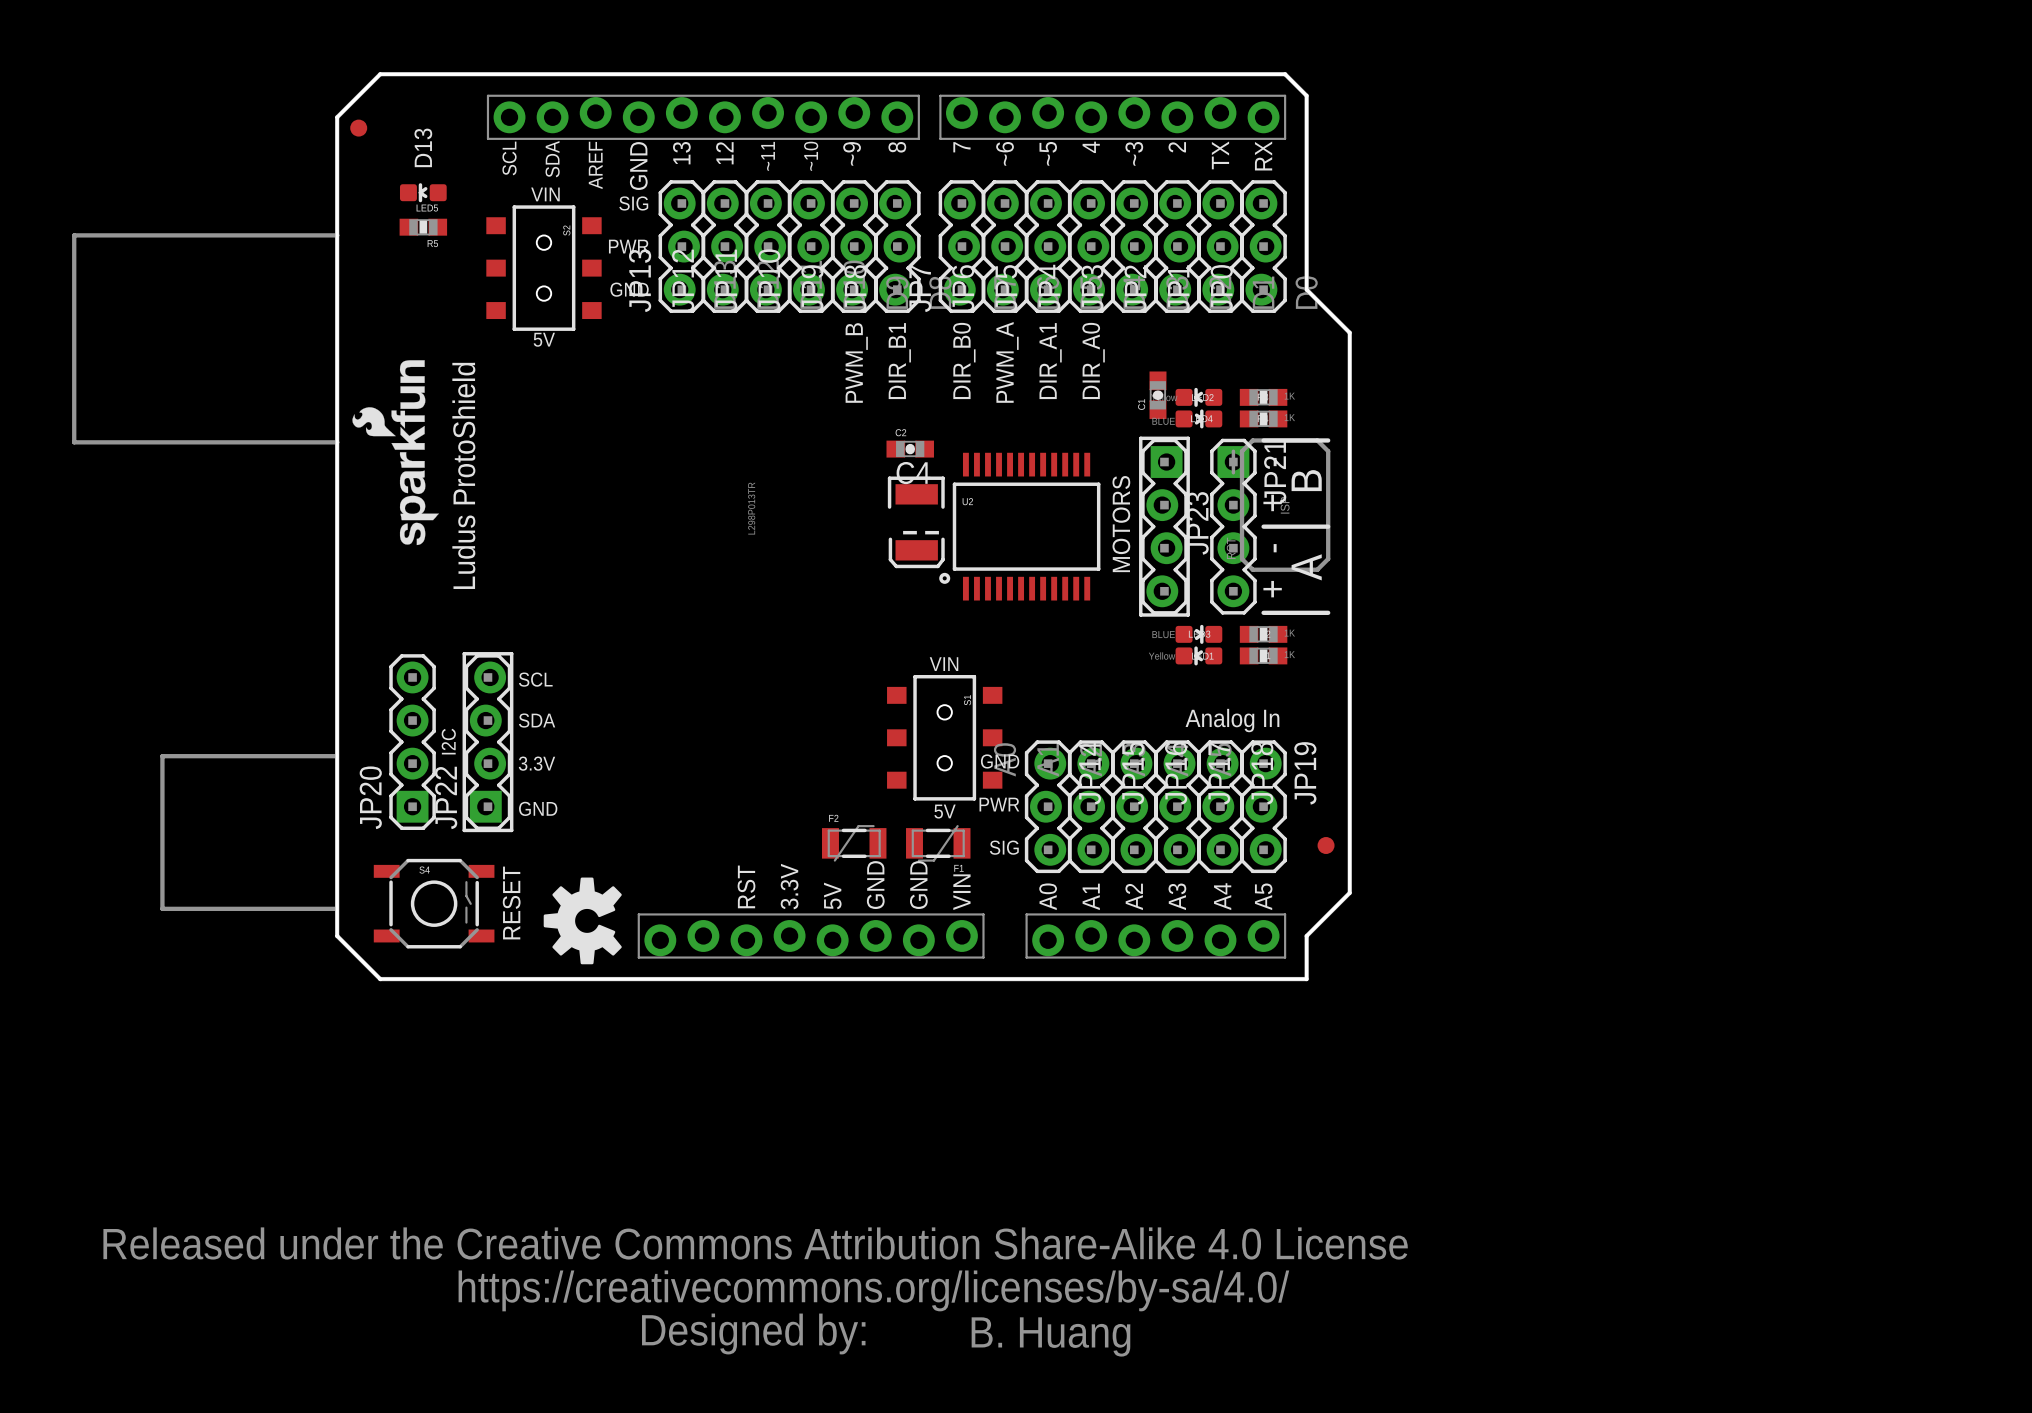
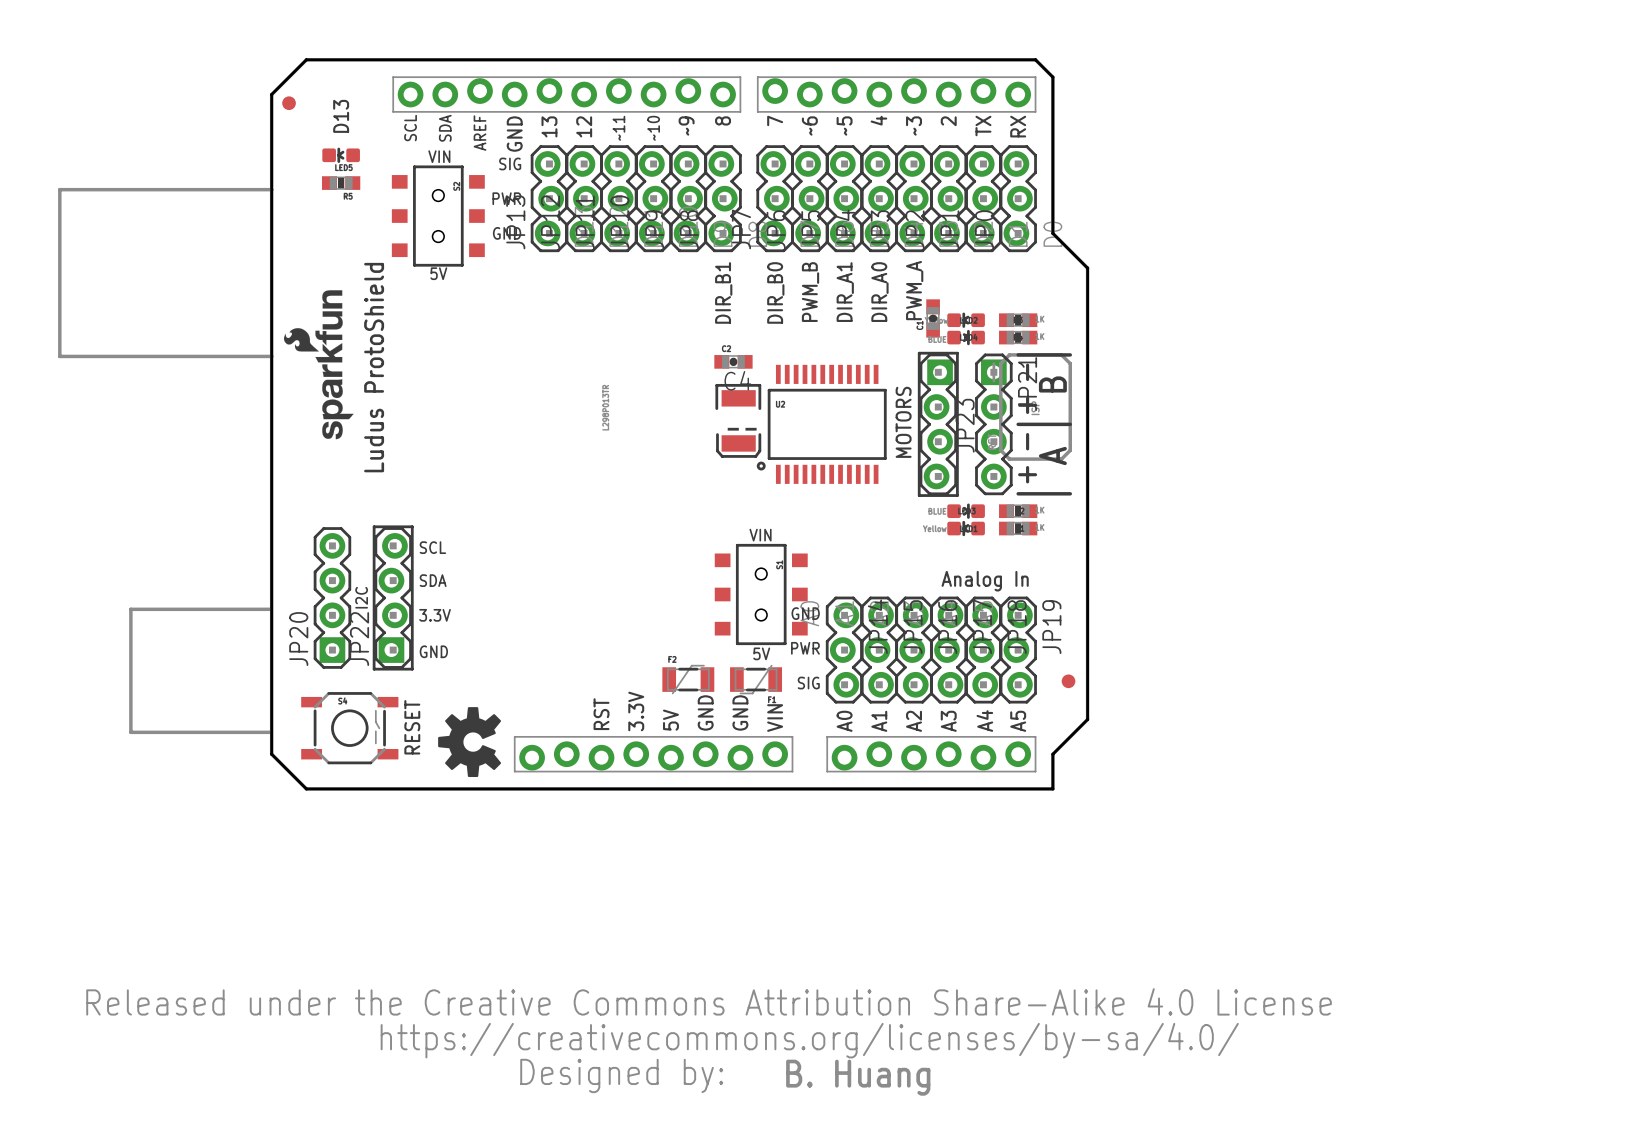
text: PWM_B (856, 362) -> none
text: PWM_A (1007, 362) -> PWM_B (810, 292)
text: none -> PWM_A (914, 290)

